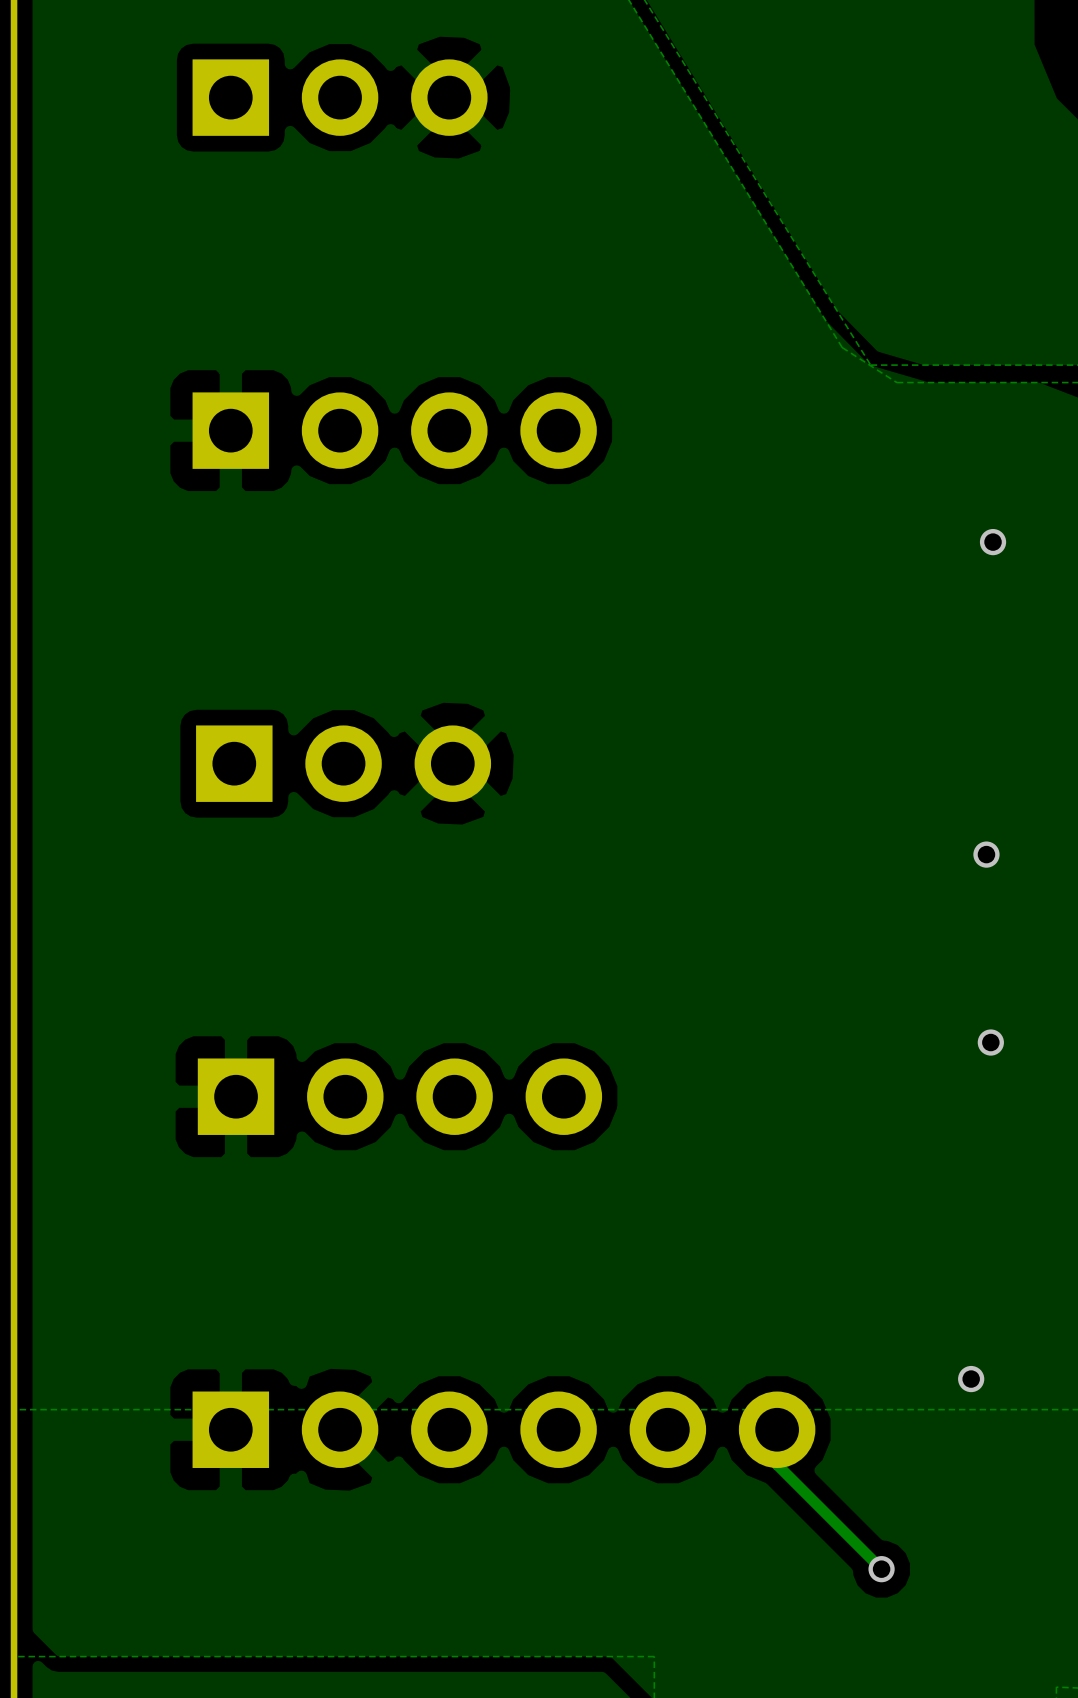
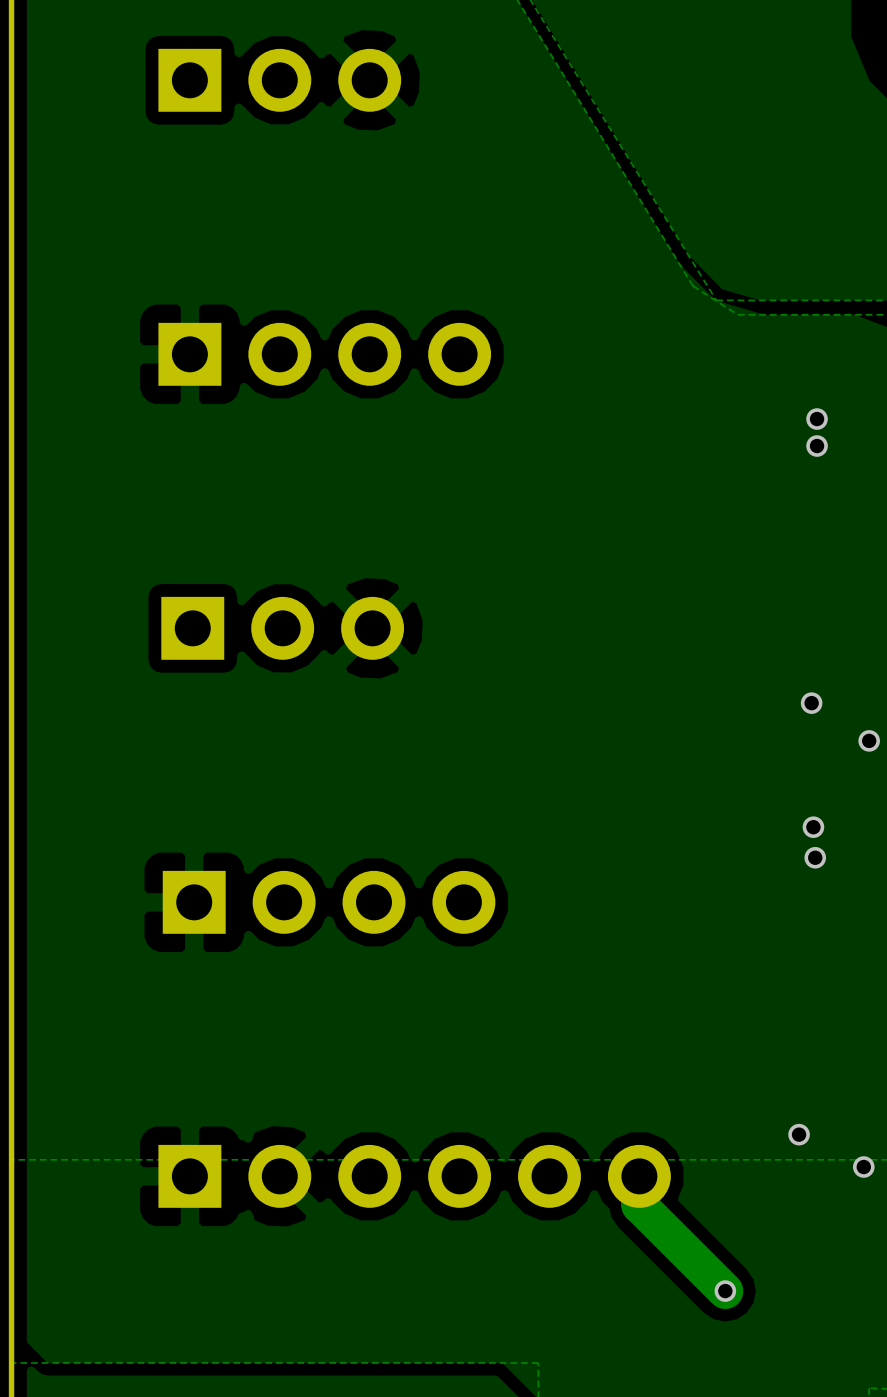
via: none -> (817, 419)
via: none -> (869, 740)
via: none -> (813, 827)
via: none -> (863, 1167)
track width: thin (777, 1429) (777, 1464) (881, 1569) -> thick (639, 1176) (639, 1205) (725, 1291)

